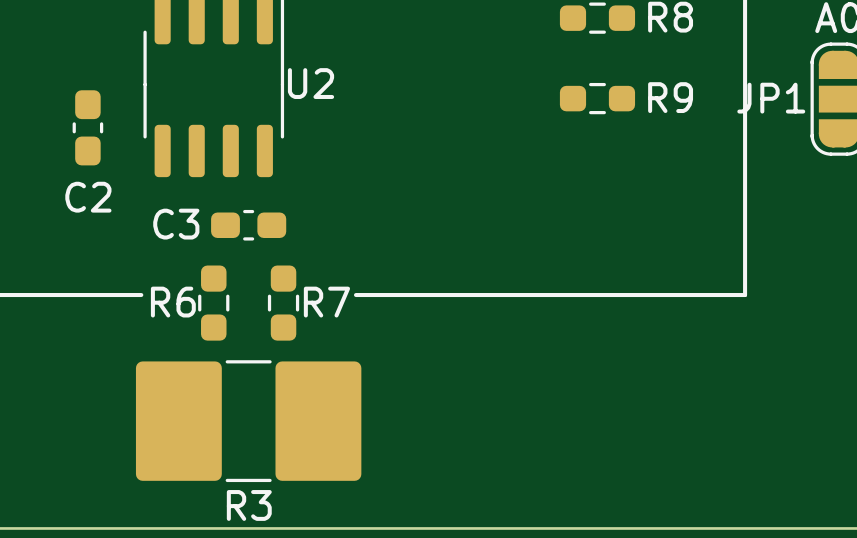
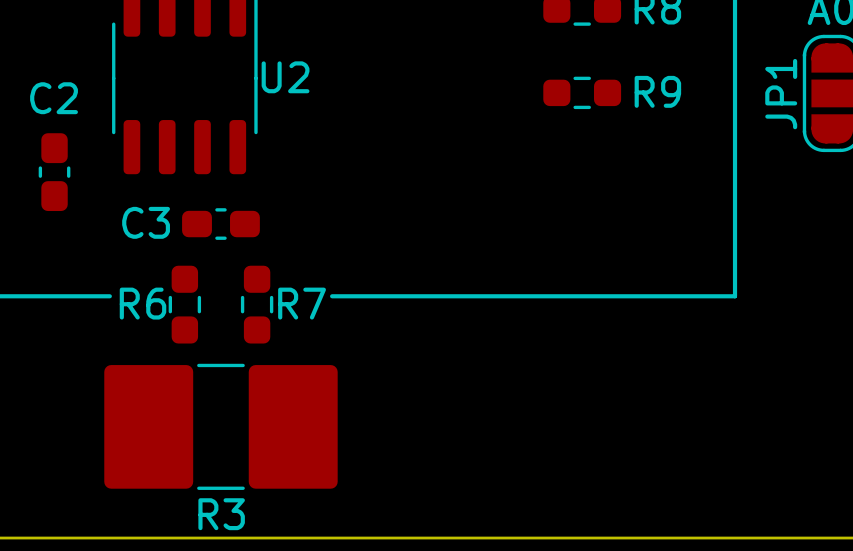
JP1 name rotation: 0° (771, 98) -> 90° counterclockwise (781, 94)
C2 position: (87, 127) -> (54, 172)
C2 name position: C2 (88, 197) -> C2 (54, 98)

